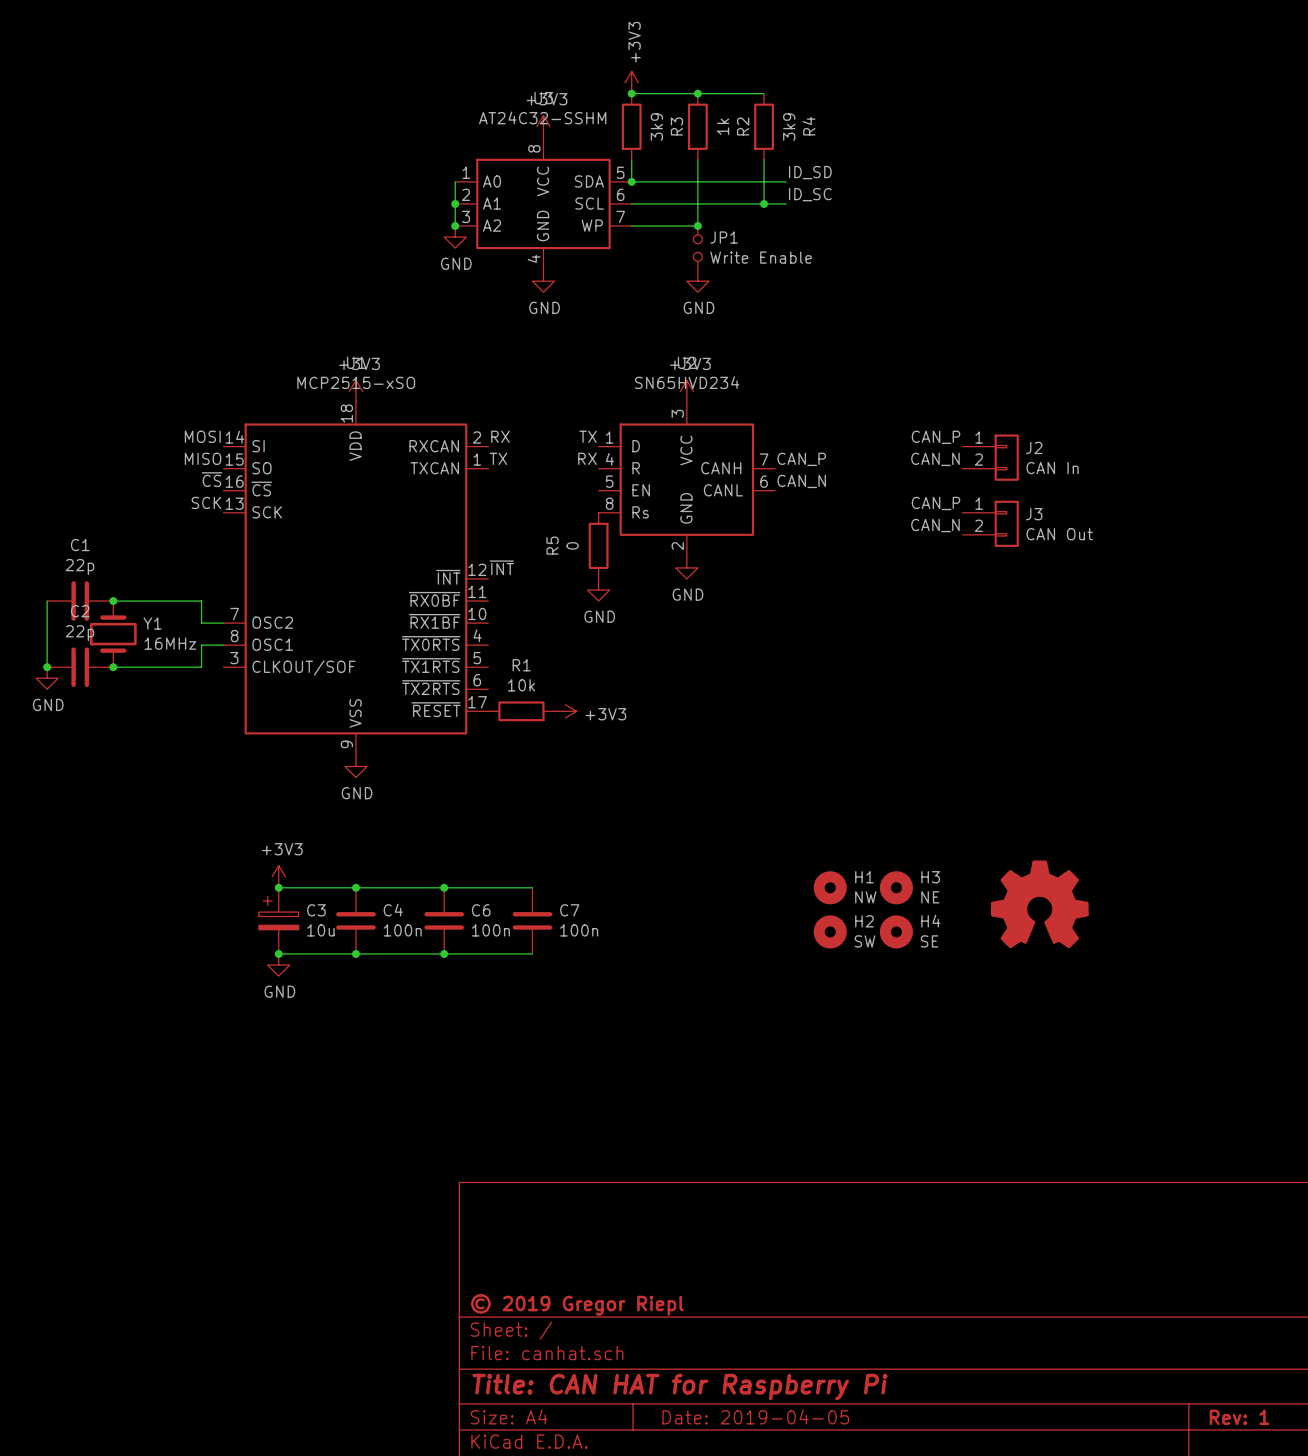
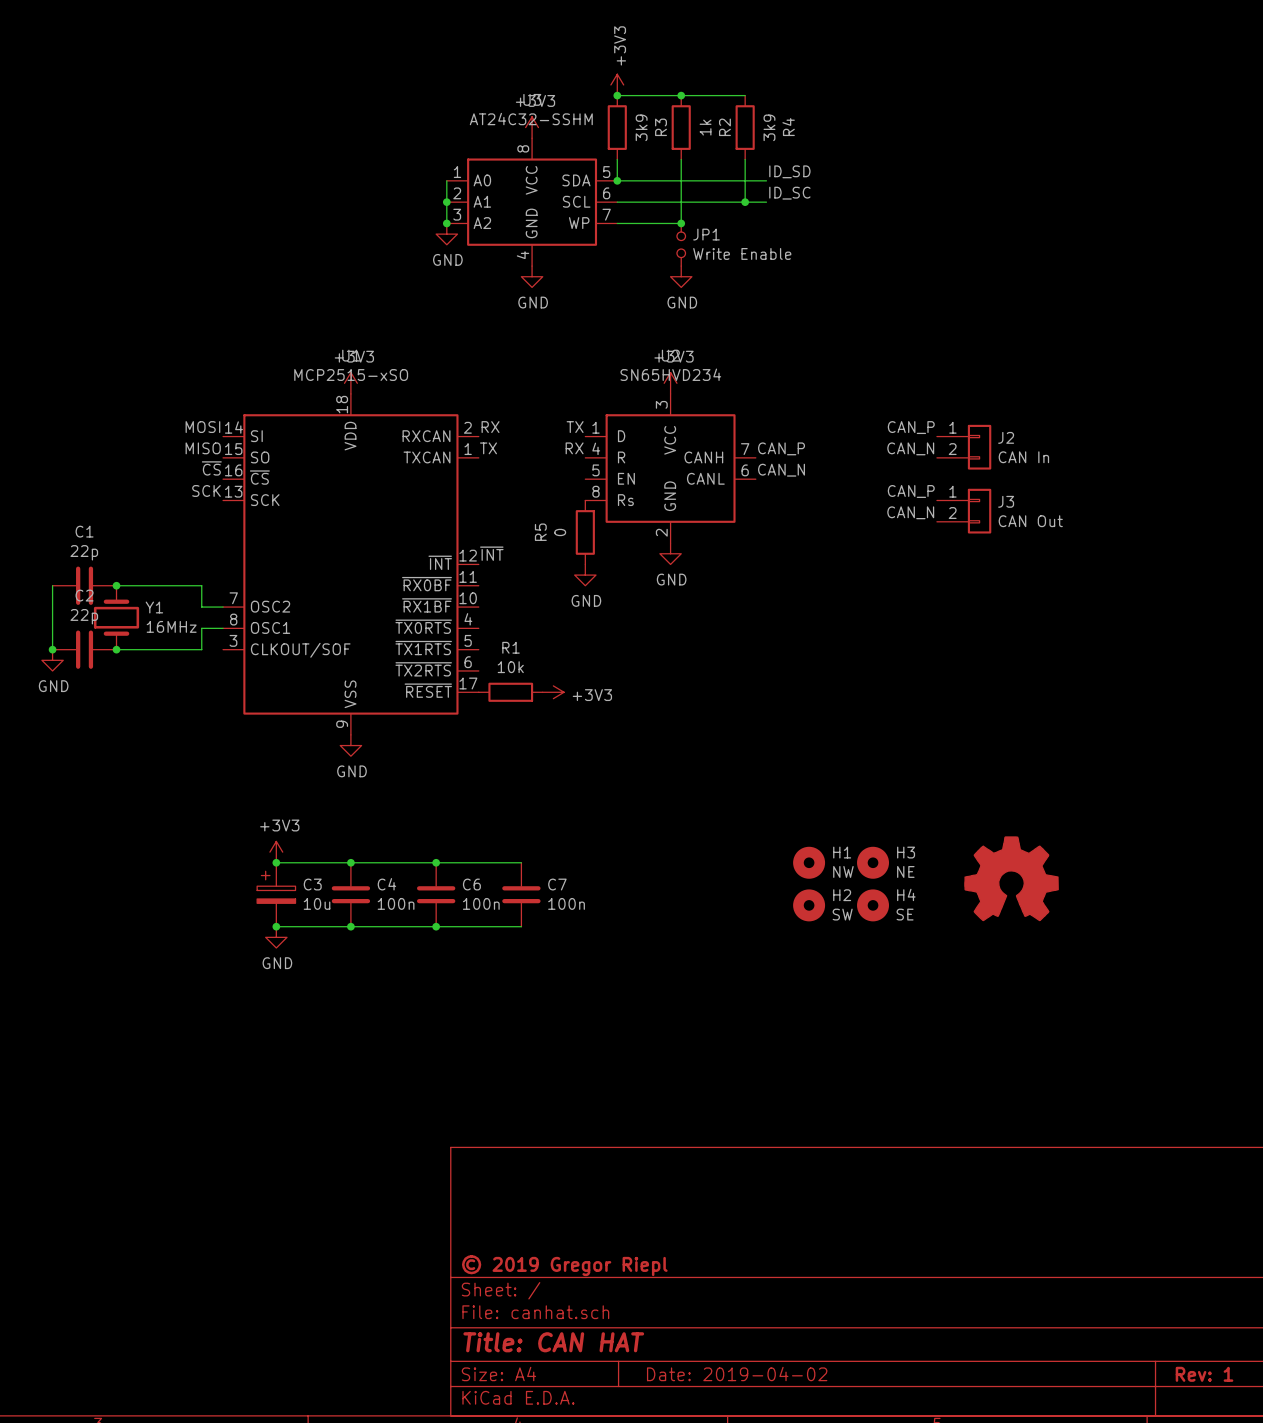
title block: Title: CAN HAT for Raspberry Pi (680, 1387) -> Title: CAN HAT (553, 1342)
title block: Date: 2019-04-05 (755, 1417) -> Date: 2019-04-02 (737, 1374)

